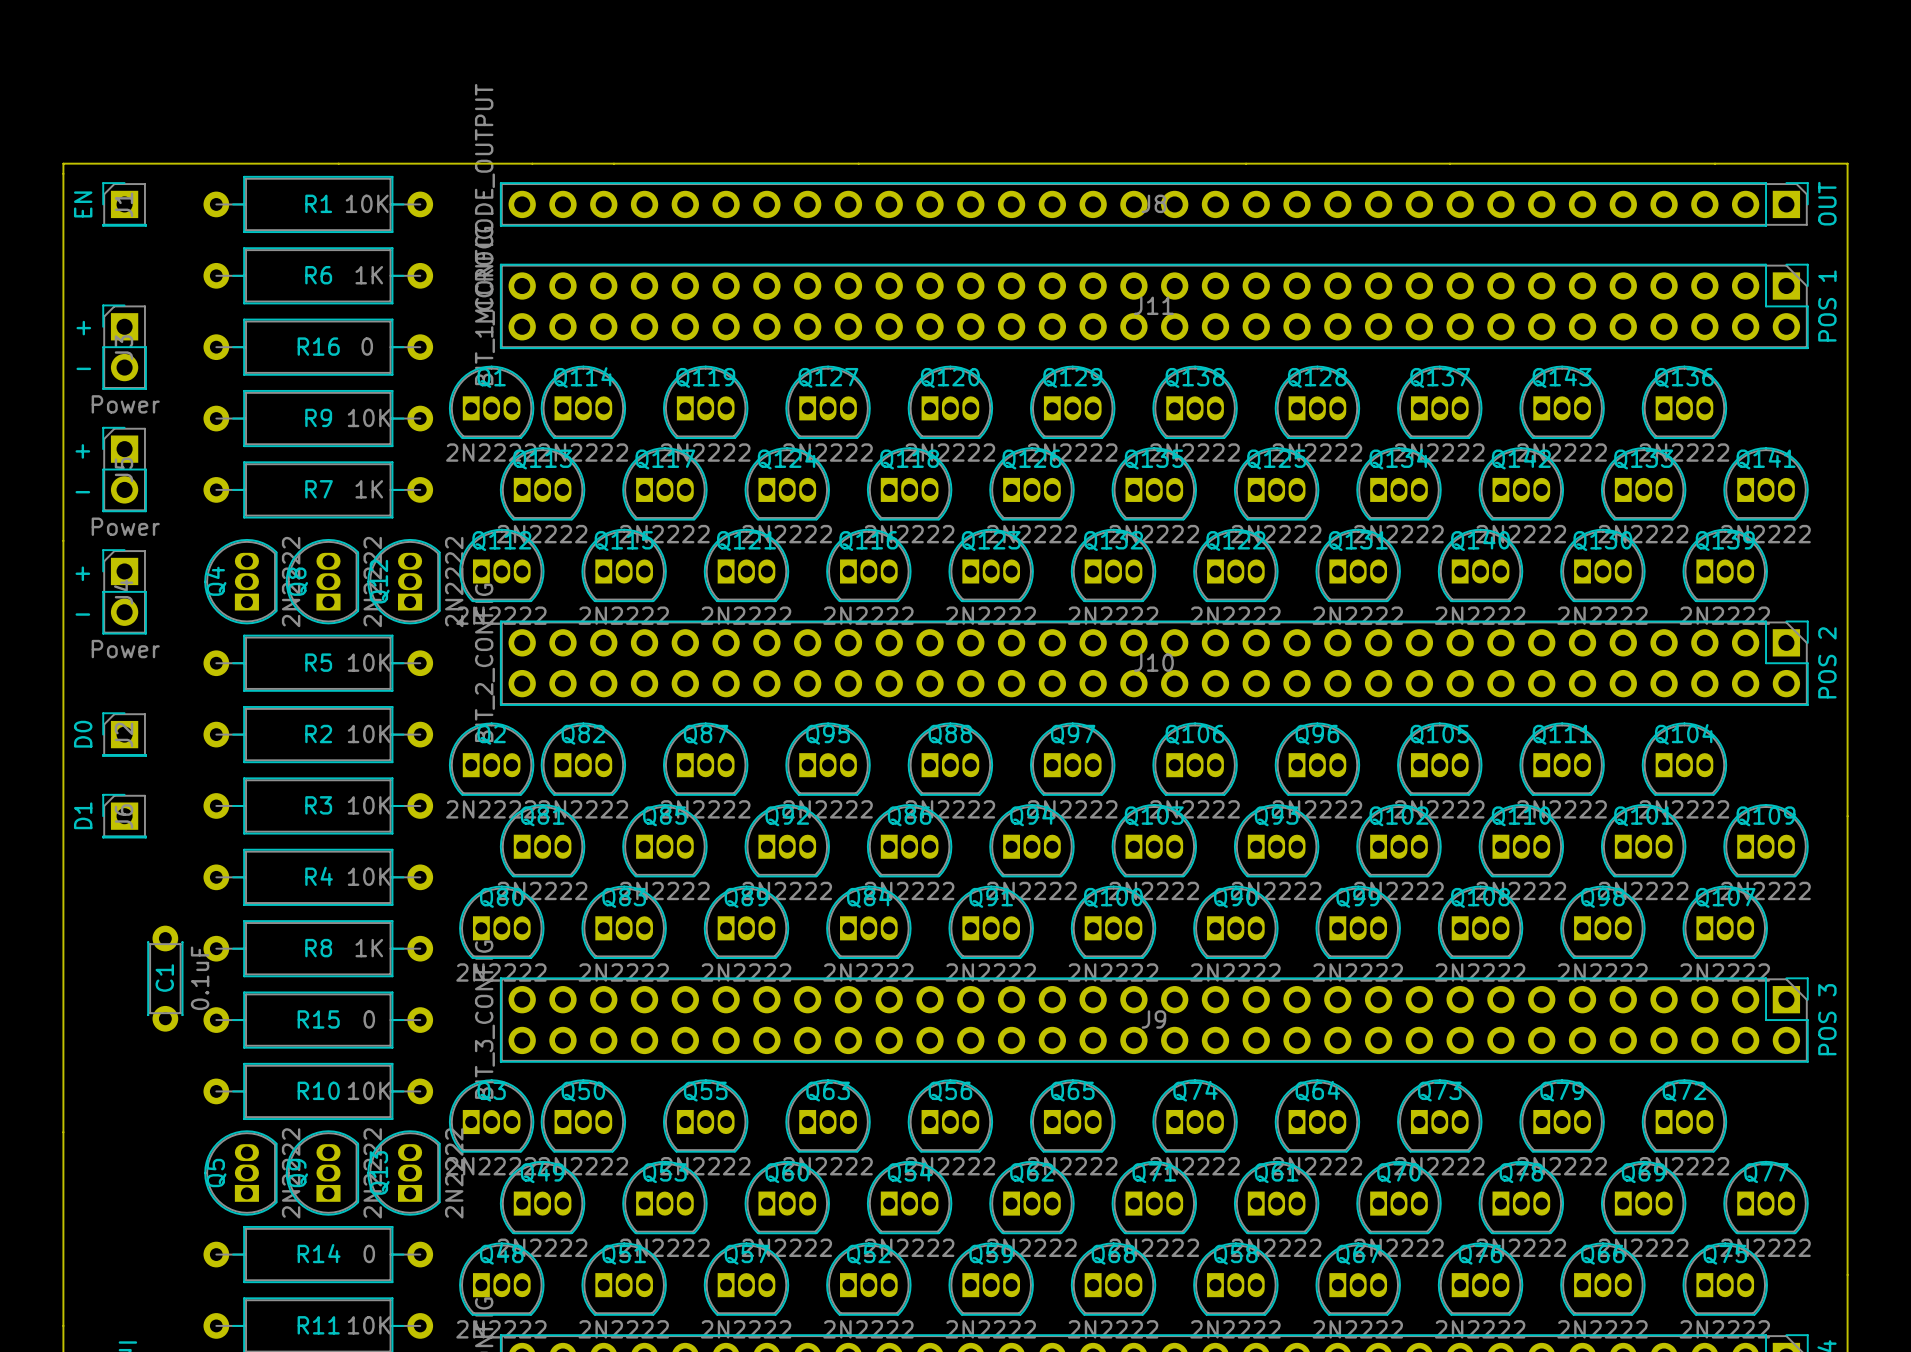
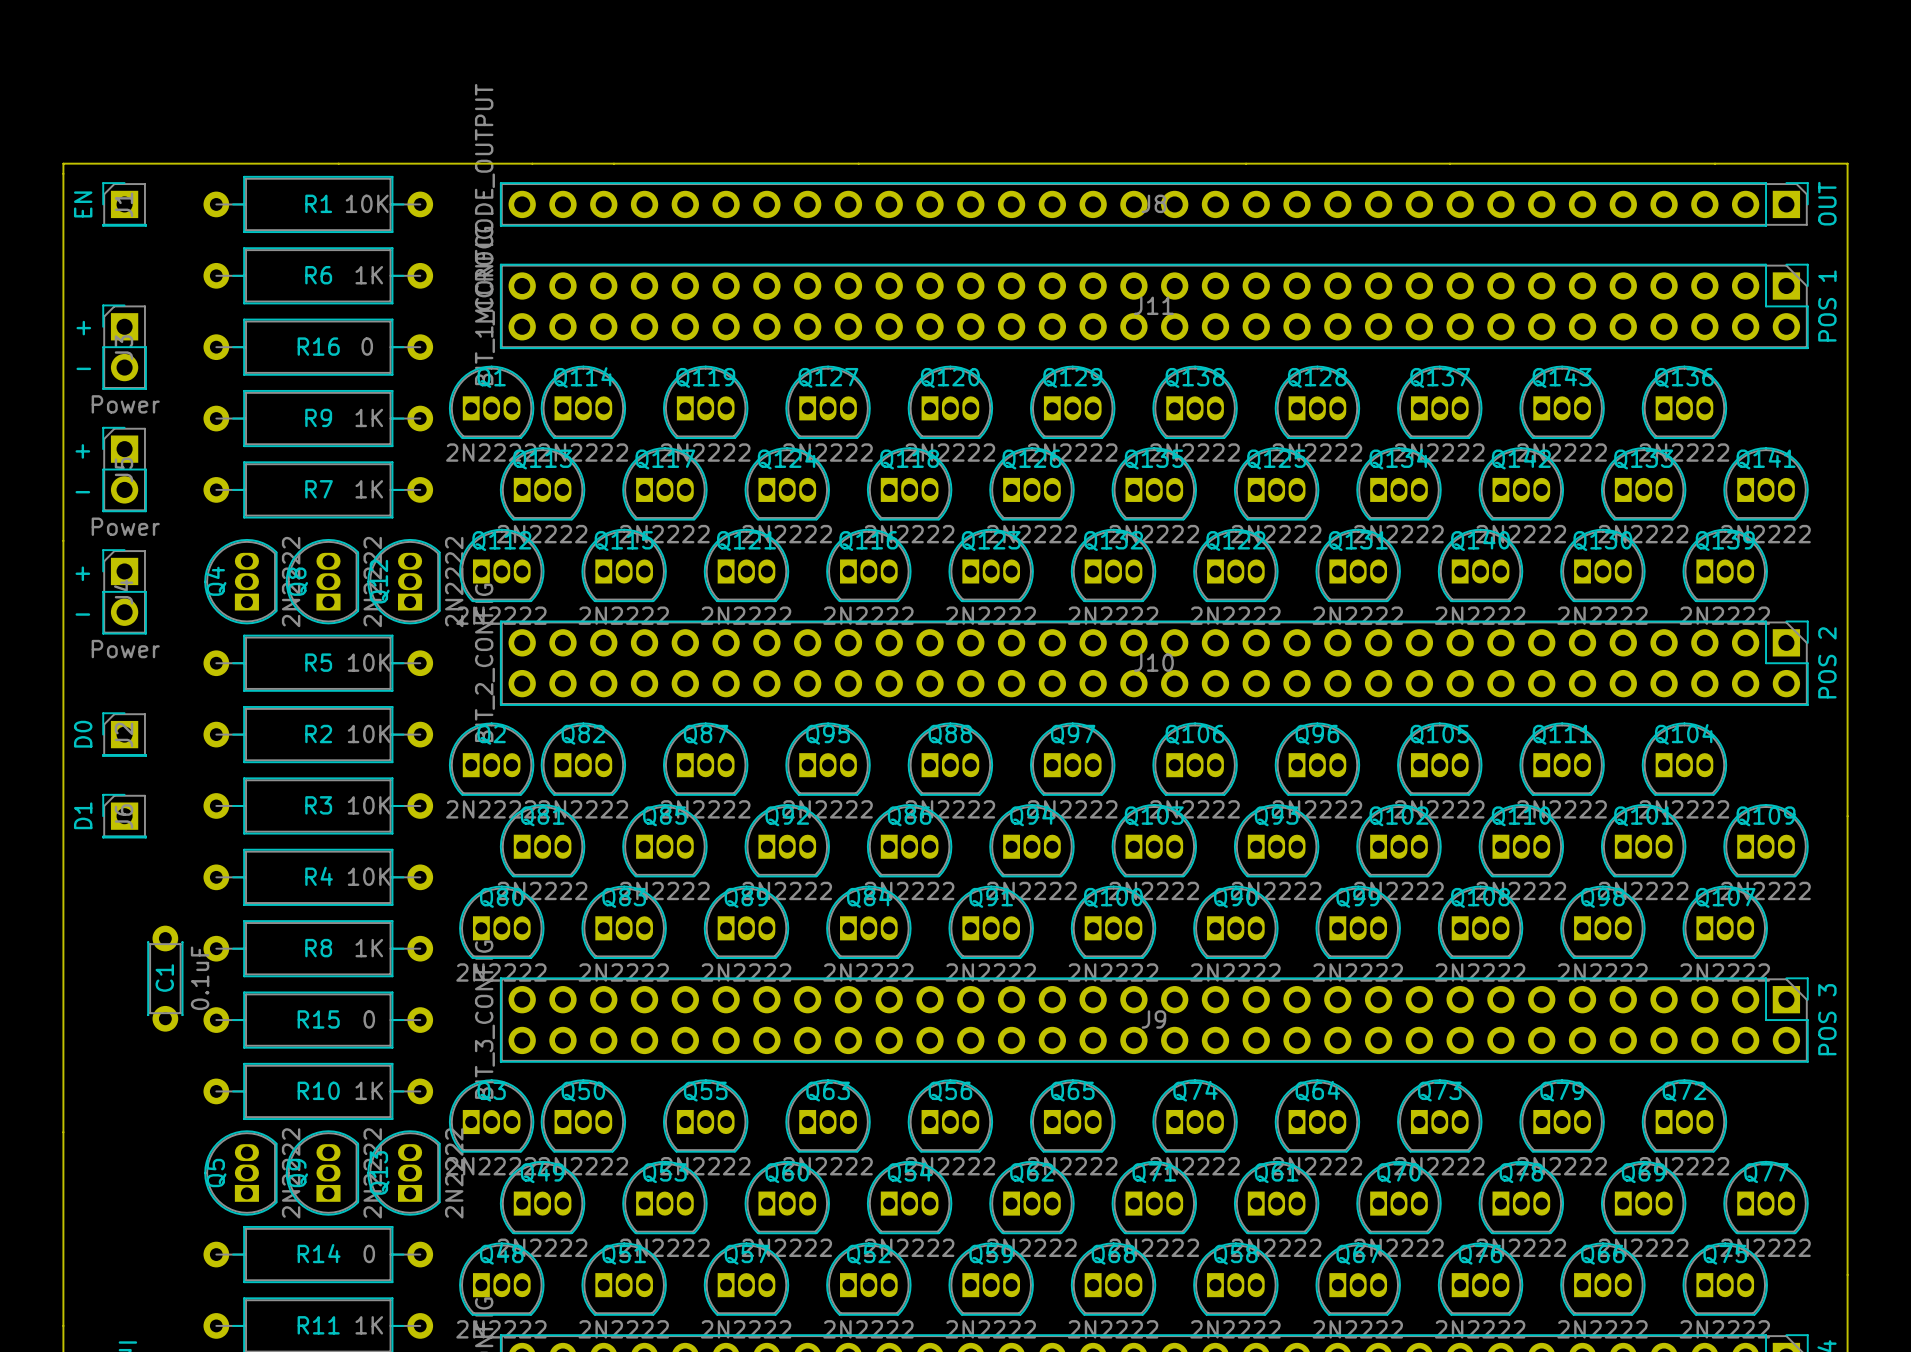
R9 value: 10K (369, 417) -> 1K (369, 417)
R10 value: 10K (369, 1090) -> 1K (369, 1090)
R11 value: 10K (369, 1325) -> 1K (369, 1325)

